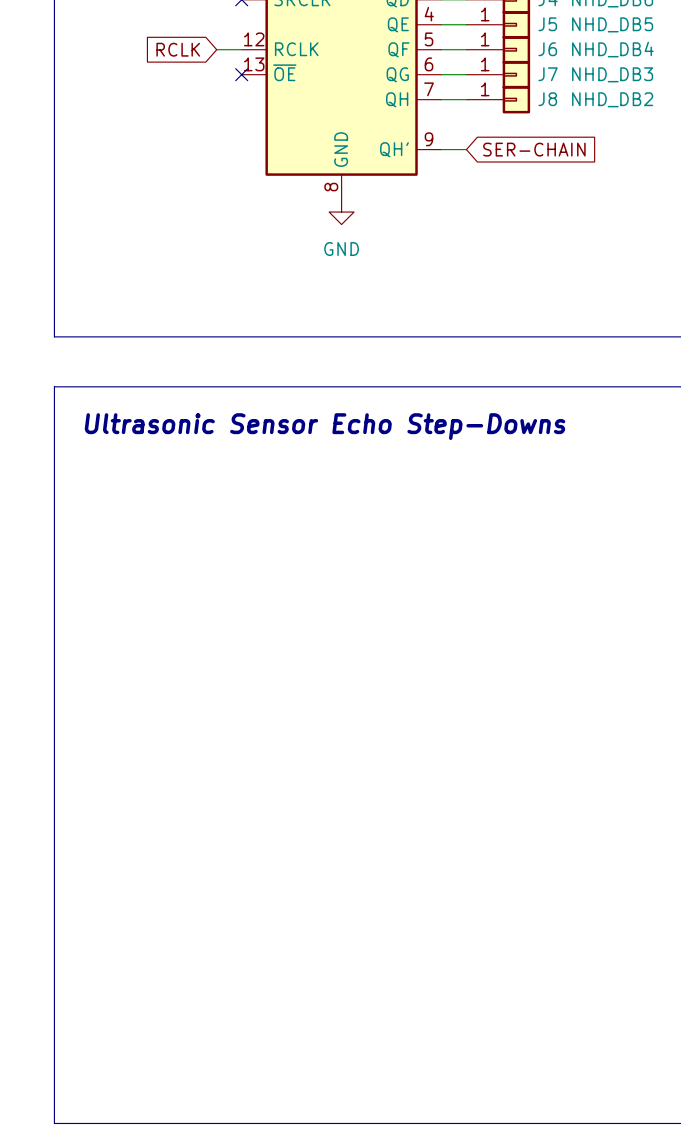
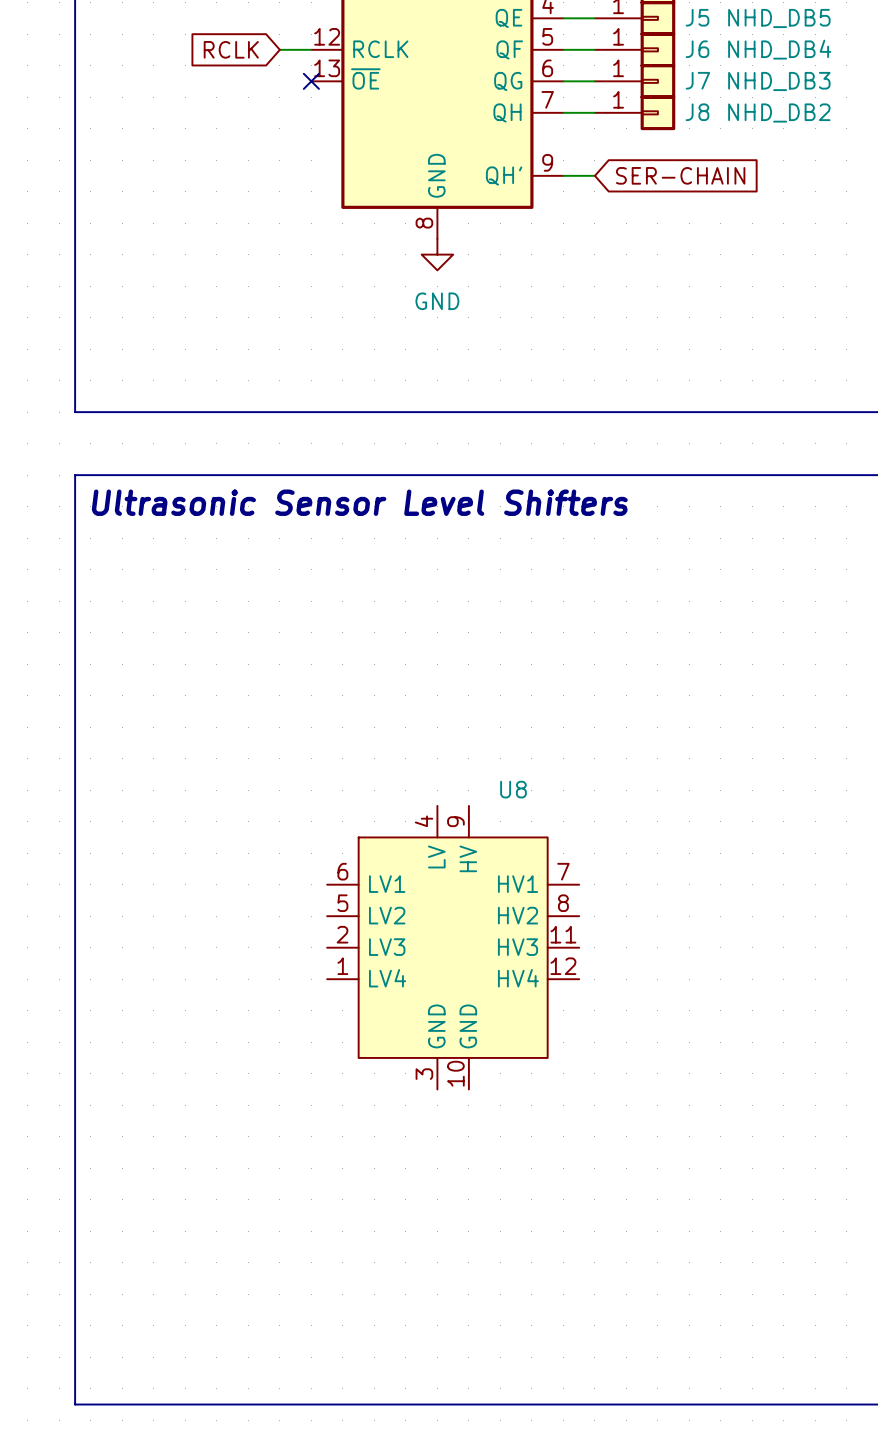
text: Ultrasonic Sensor Echo Step-Downs (325, 426) -> Ultrasonic Sensor Level Shifters (359, 502)
U8: none -> (453, 947)

